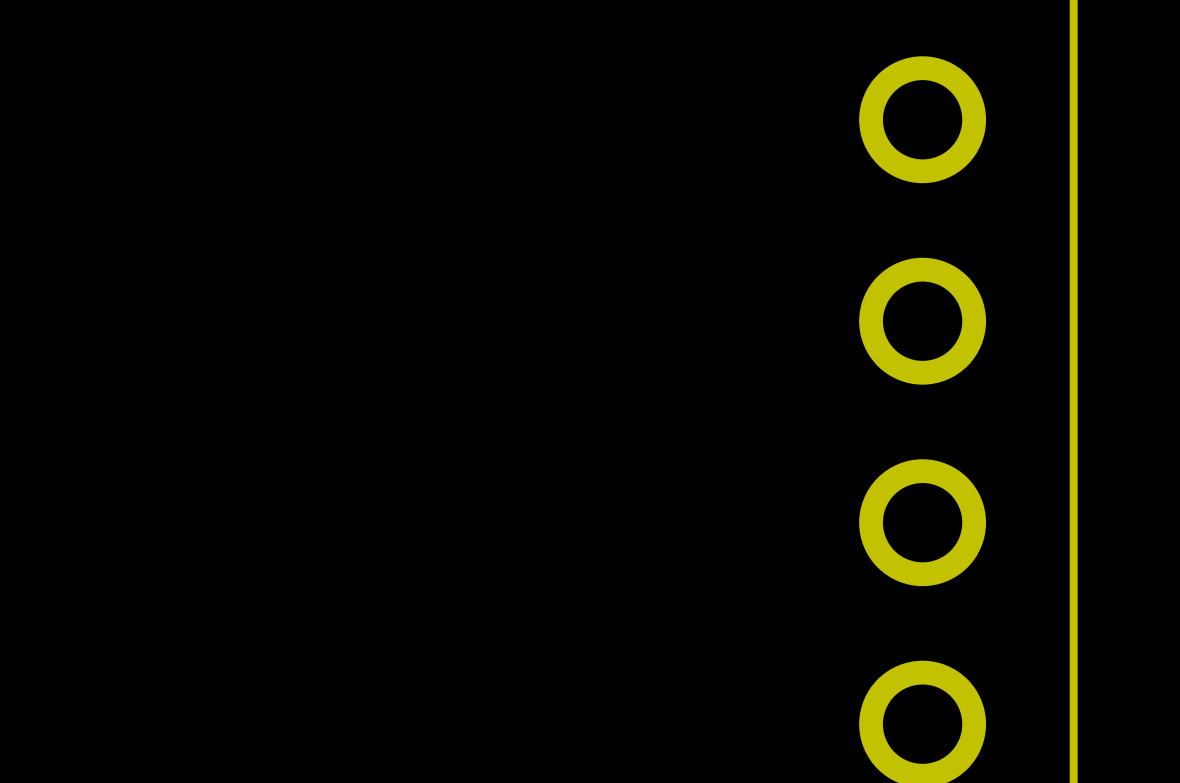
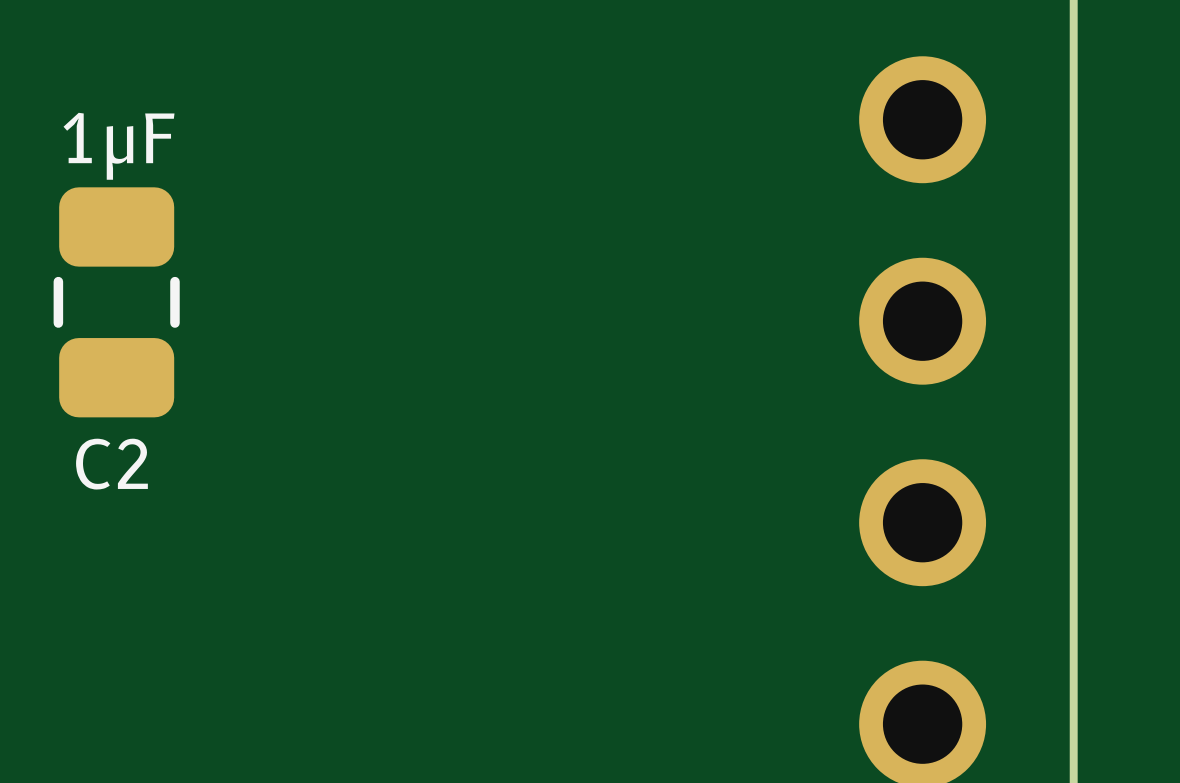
C2: none -> 1μF (116, 302)

